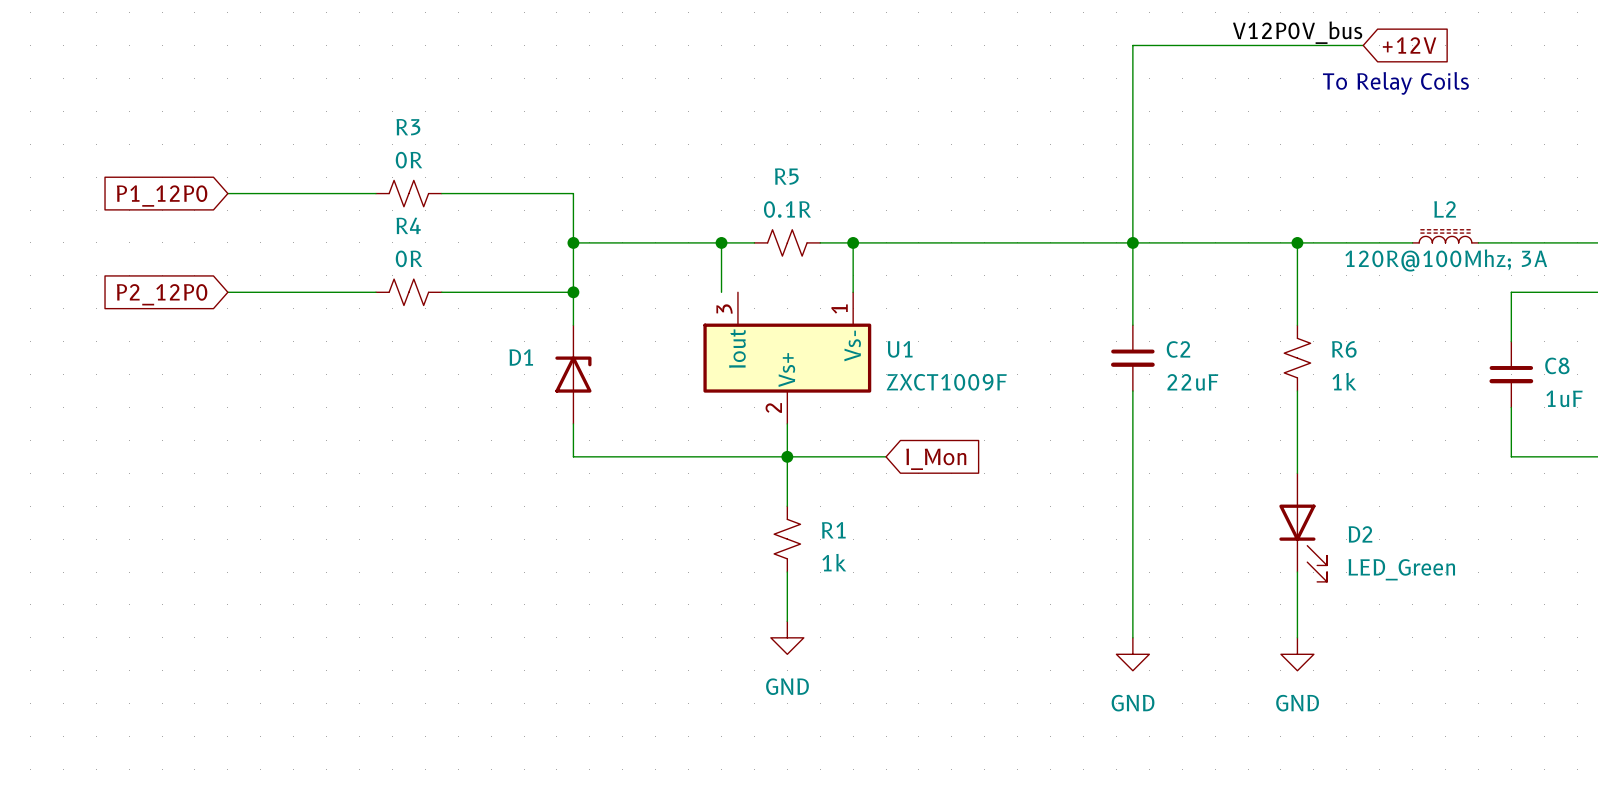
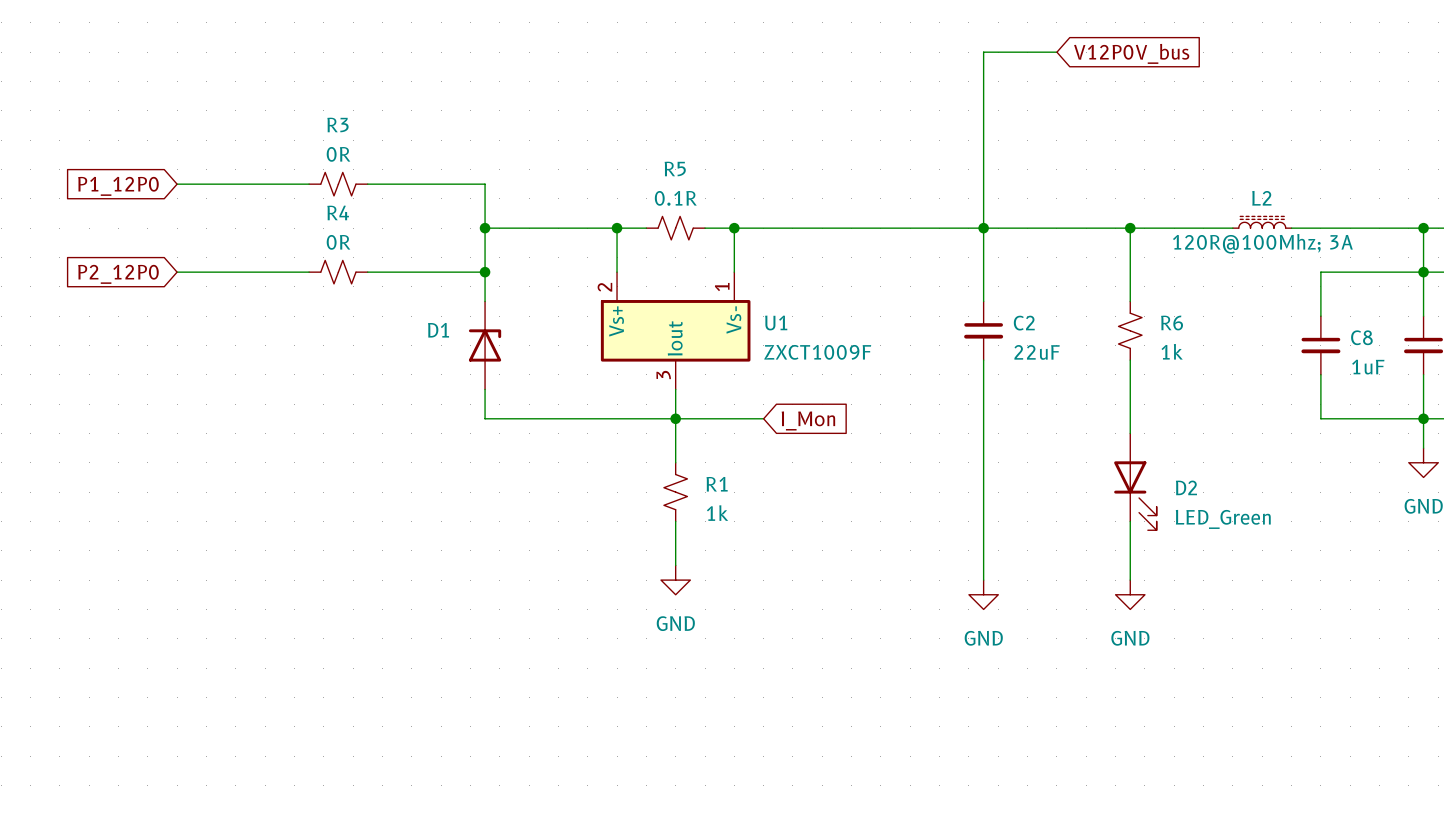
label: V12P0V_bus (1297, 32) -> none
wire: (1215, 45) (1363, 45) -> none
global label: +12V (1409, 45) -> none
global label: none -> V12P0V_bus (1131, 53)
text: To Relay Coils (1395, 83) -> none
U1 symbol: [703, 292, 872, 424] -> [600, 272, 751, 390]

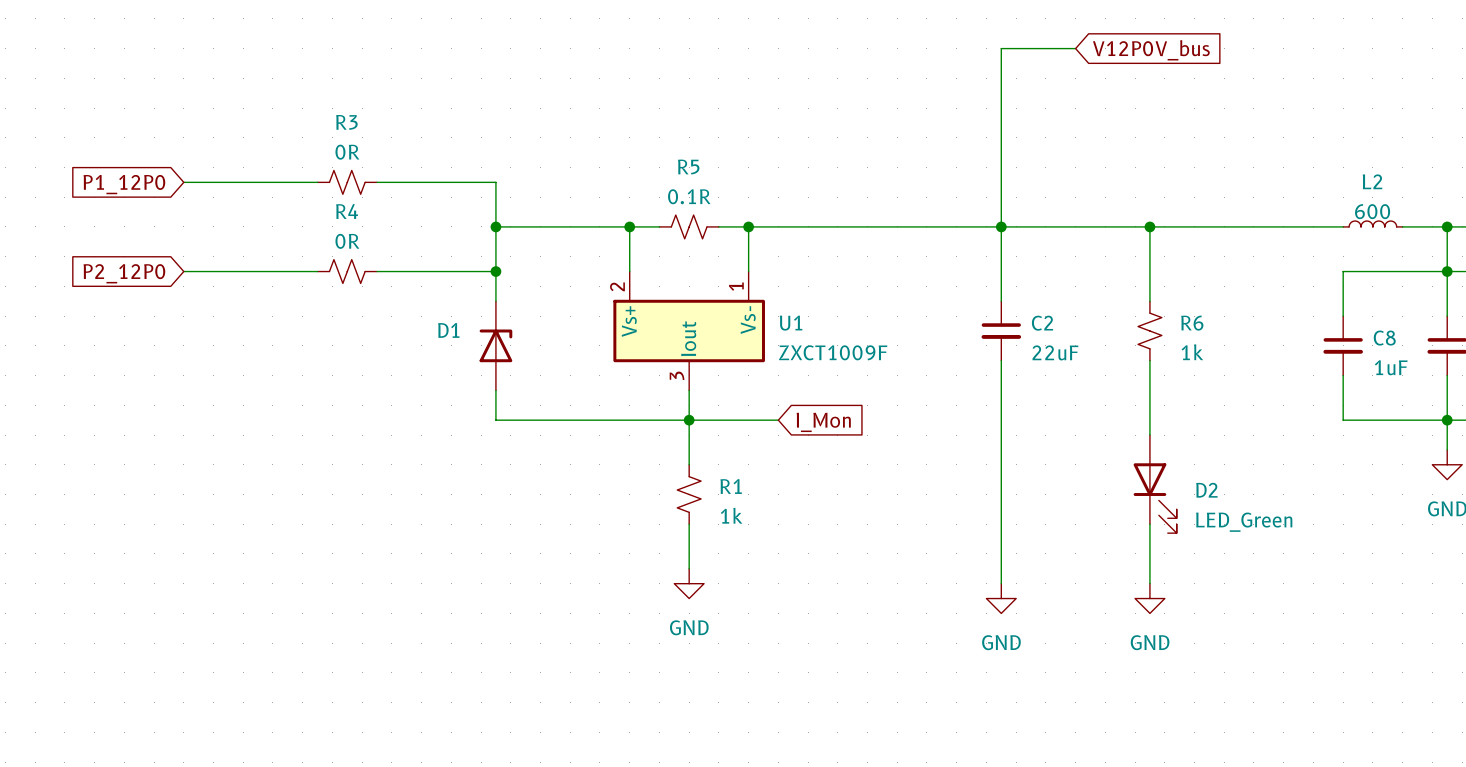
L2 symbol: [1232, 216, 1292, 229] -> [1343, 221, 1403, 227]
wire: (1320, 228) (1379, 228) -> (1253, 226) (1313, 226)
L2 value: 120R@100Mhz; 3A (1262, 243) -> 600 (1372, 211)

